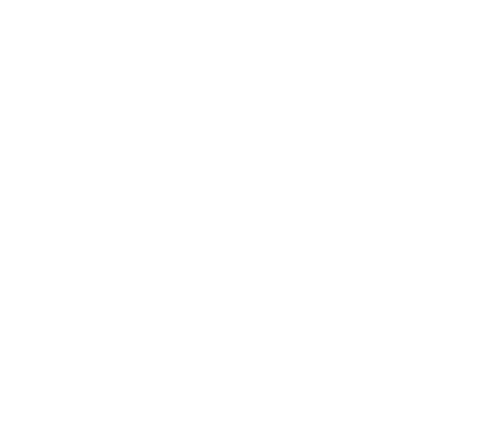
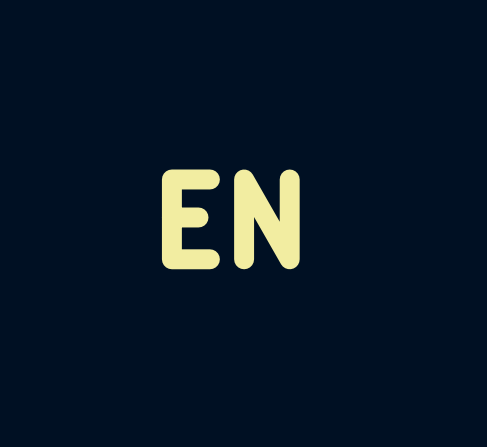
text: none -> EN (230, 219)

